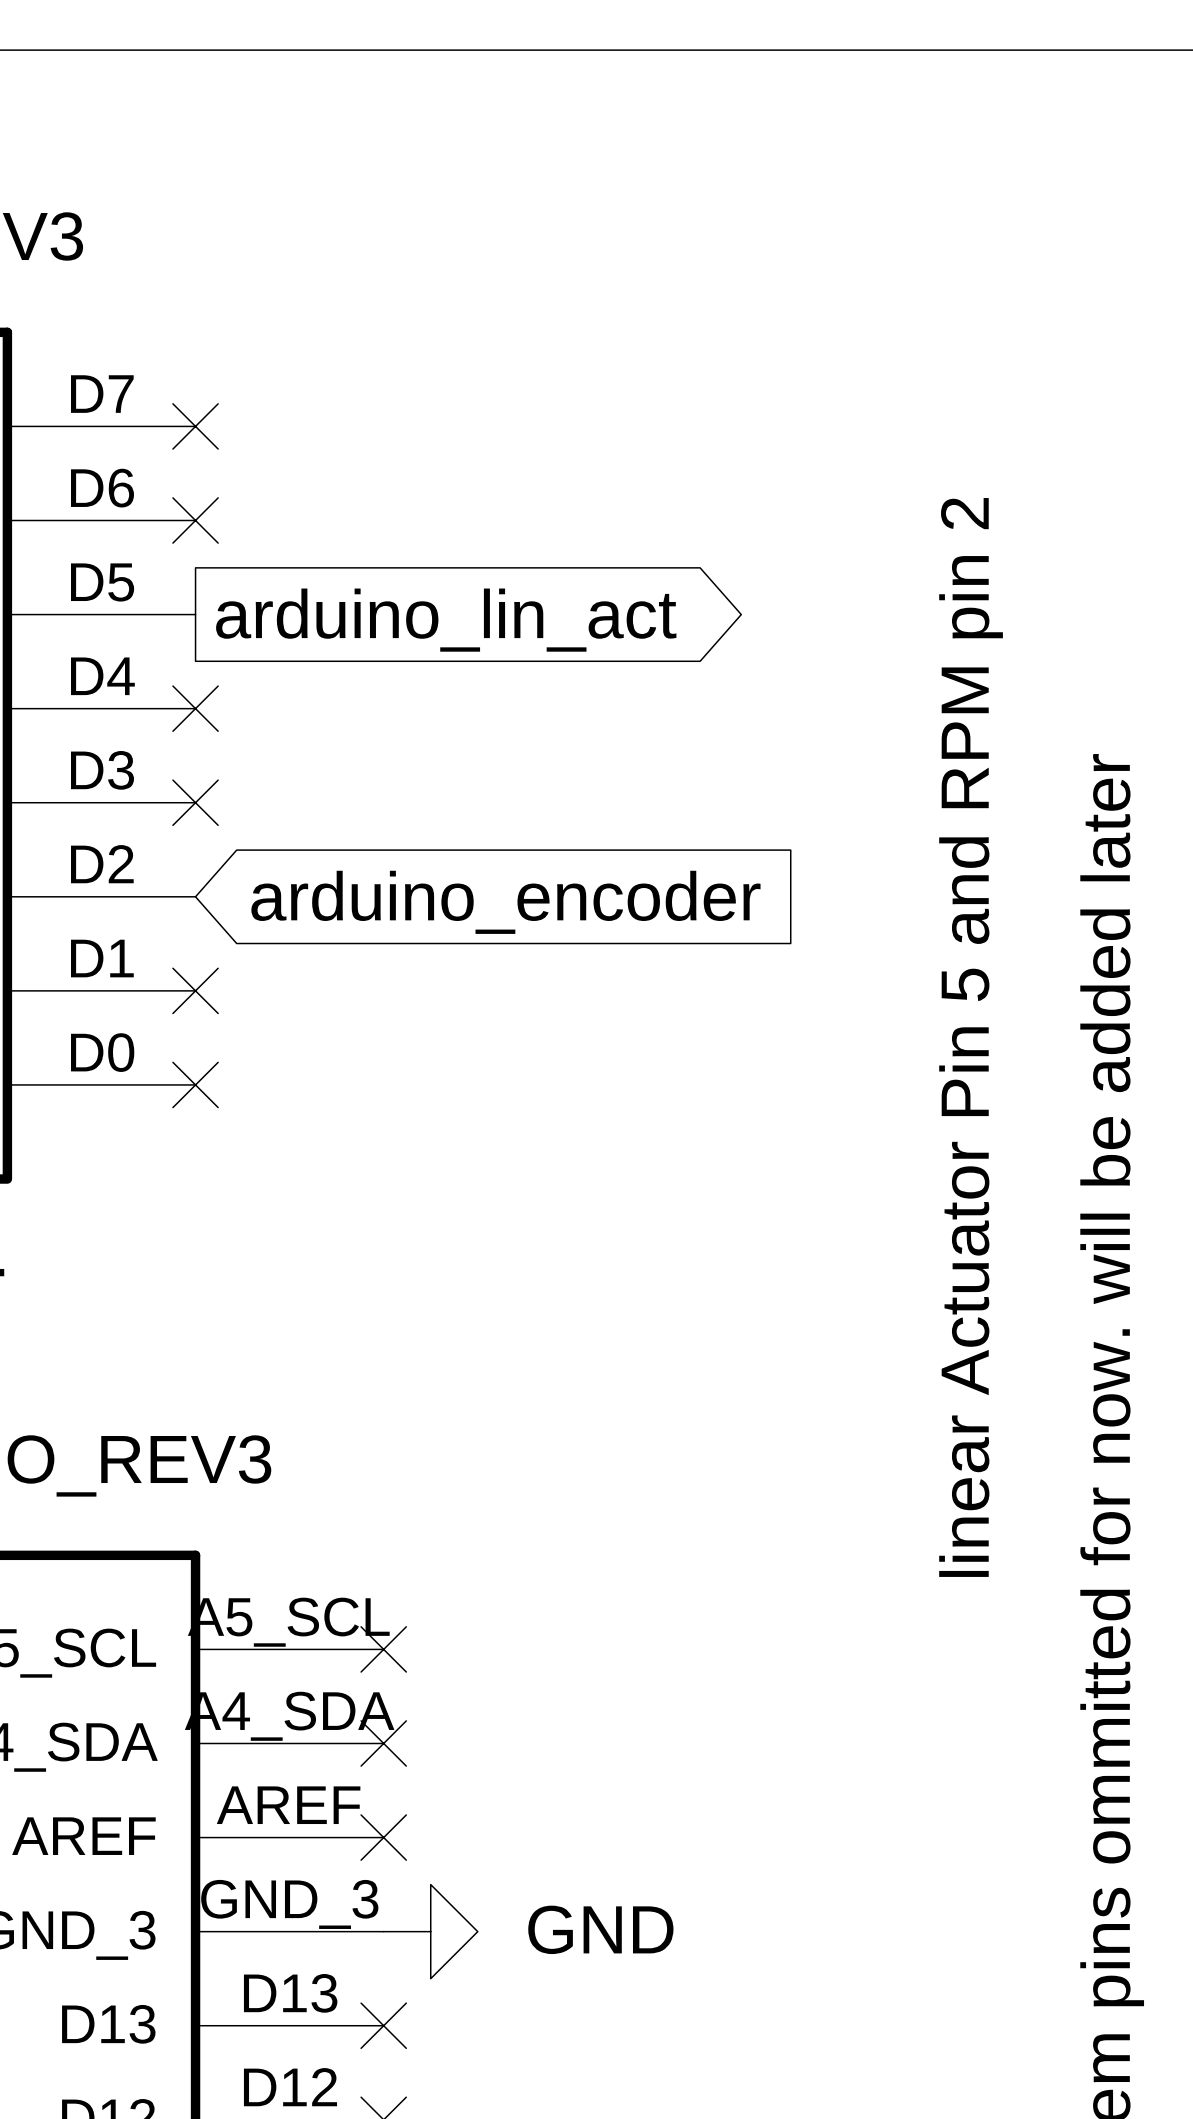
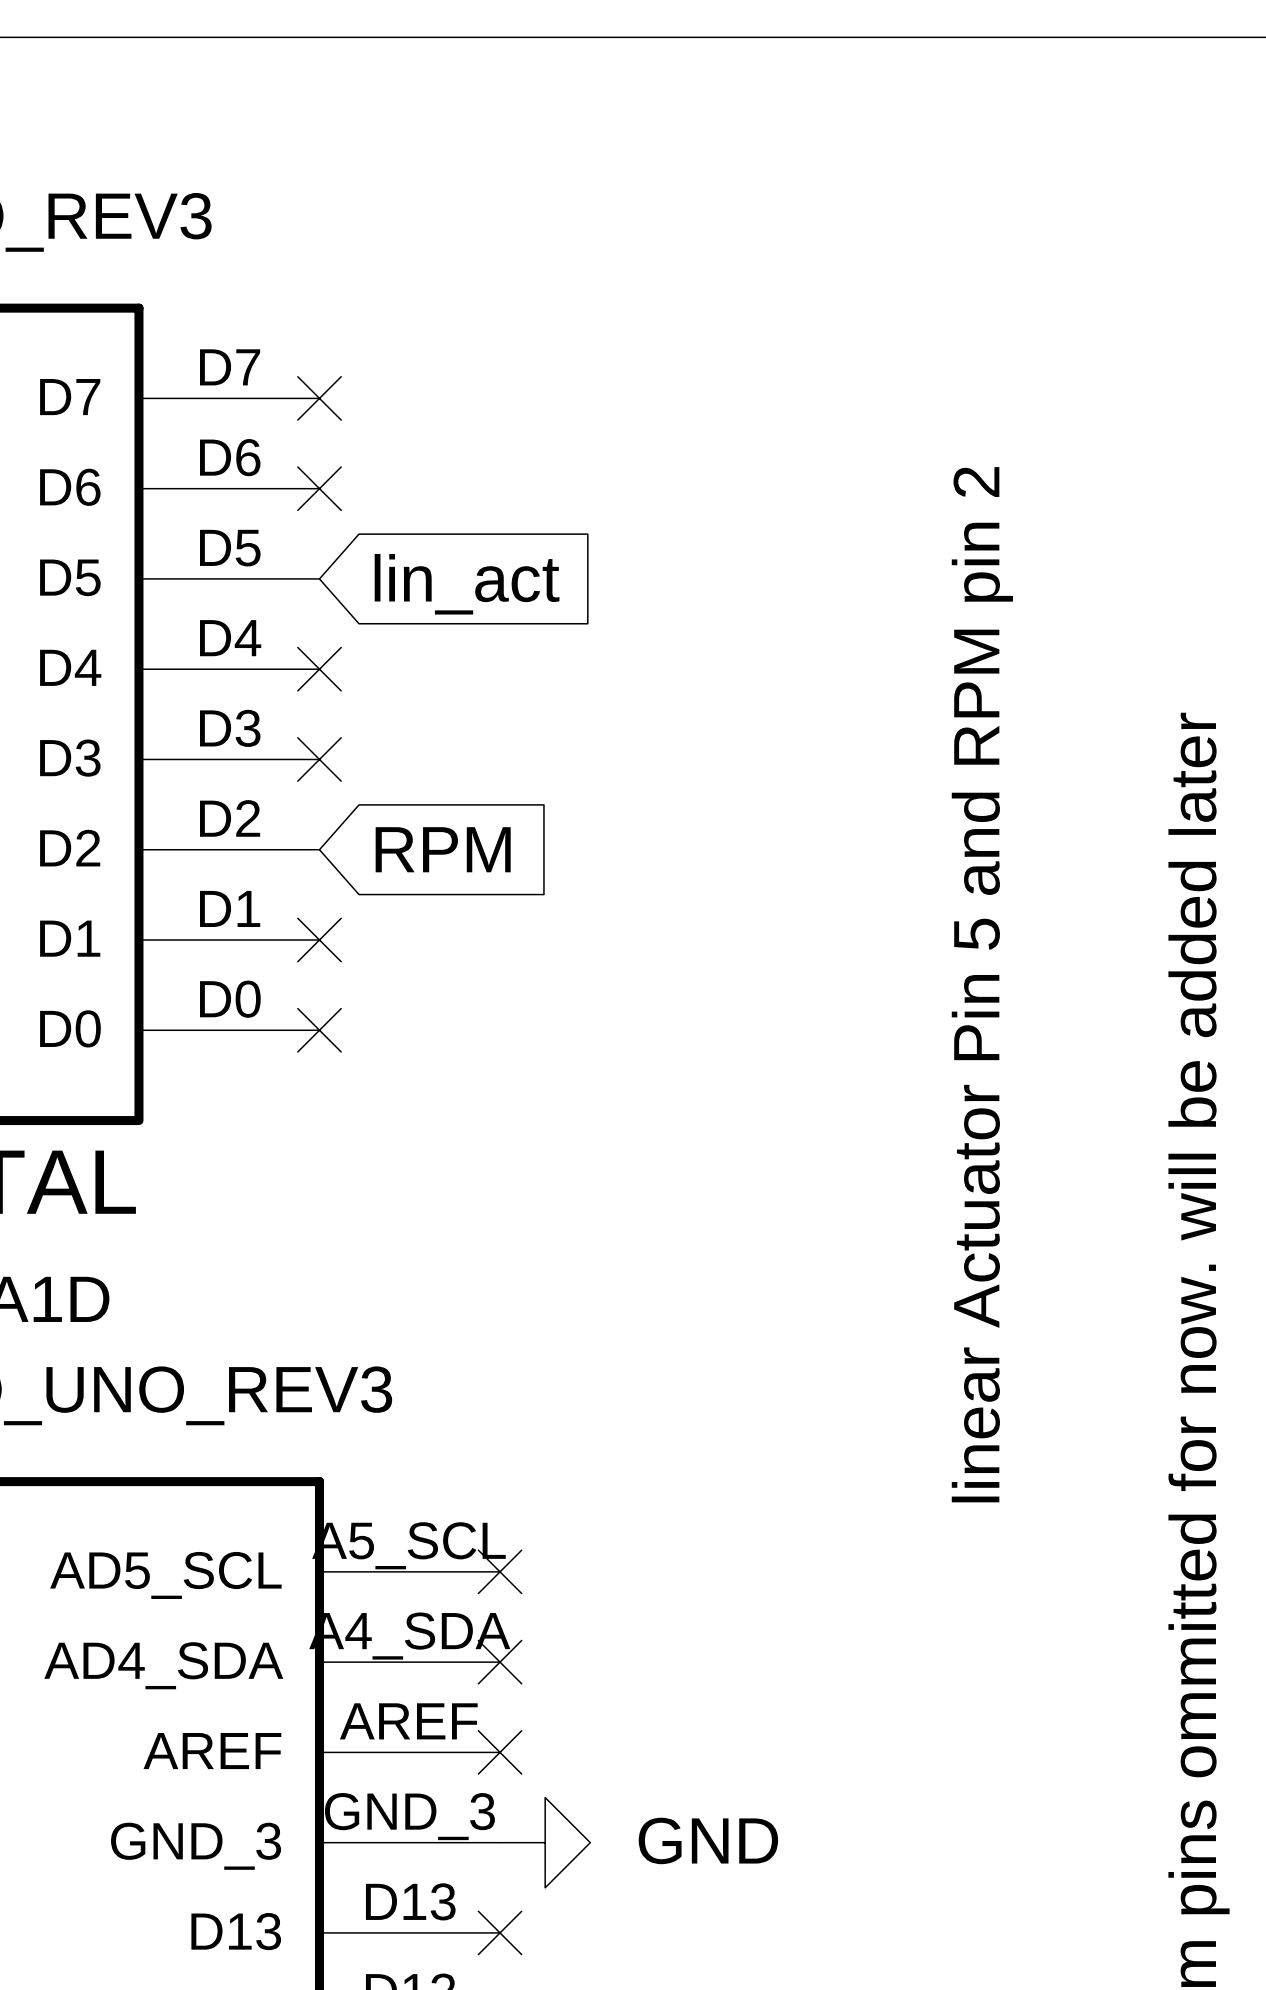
global label shape: output (446, 620) -> input (467, 584)
global label: arduino_lin_act (446, 620) -> lin_act (467, 584)
global label: arduino_encoder (505, 902) -> RPM (443, 849)
text position: linear Actuator Pin 5 and RPM pin 2 (971, 1037) -> linear Actuator Pin 5 and RPM pin 2 (982, 984)

